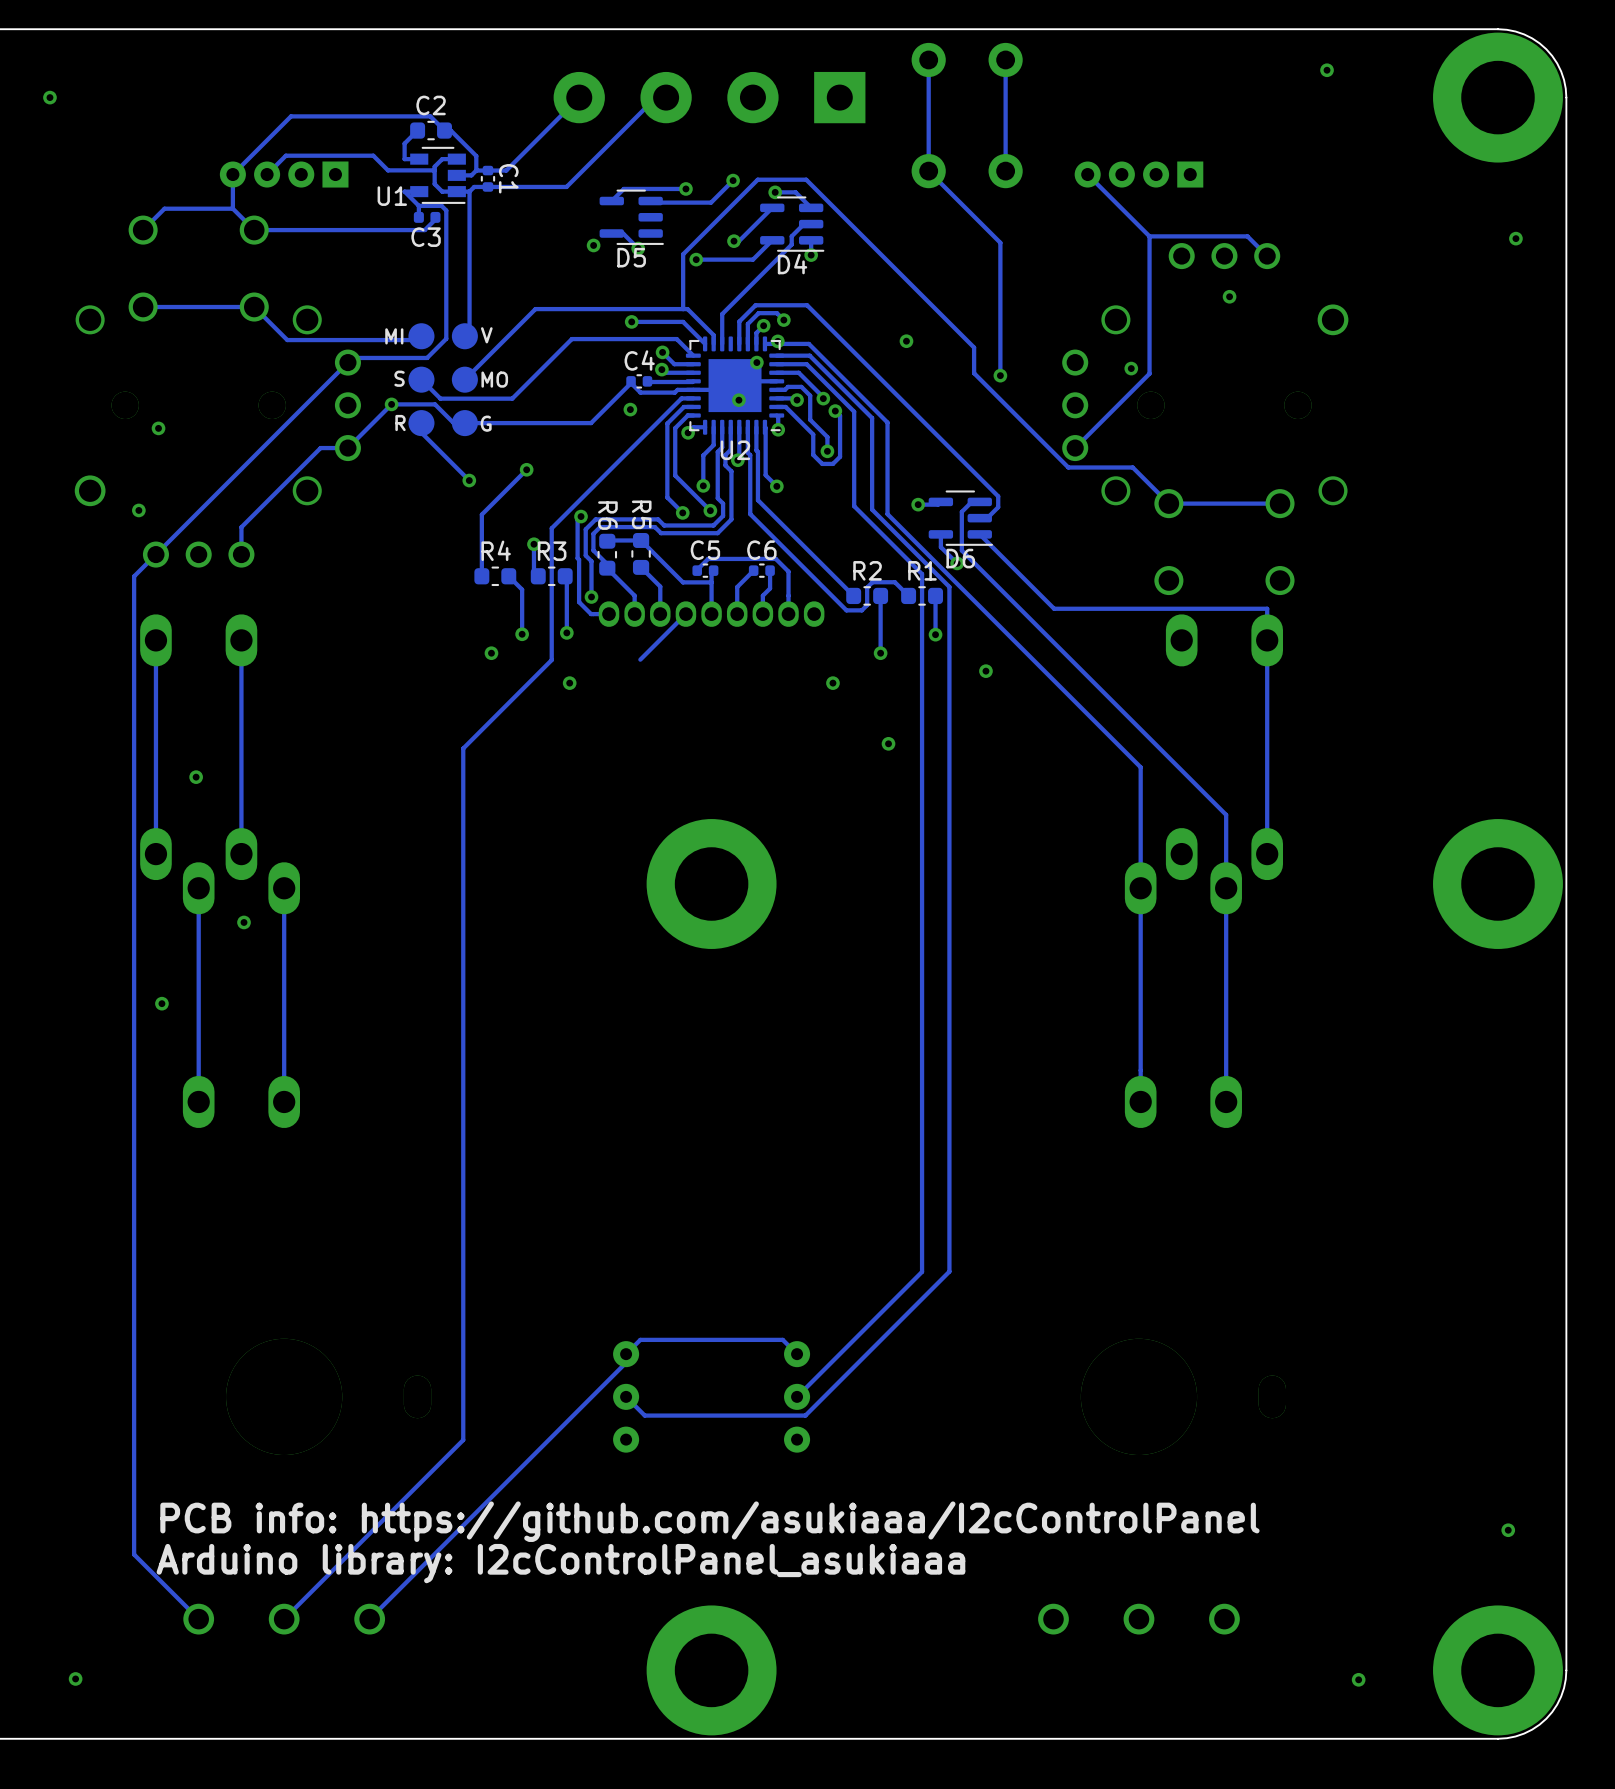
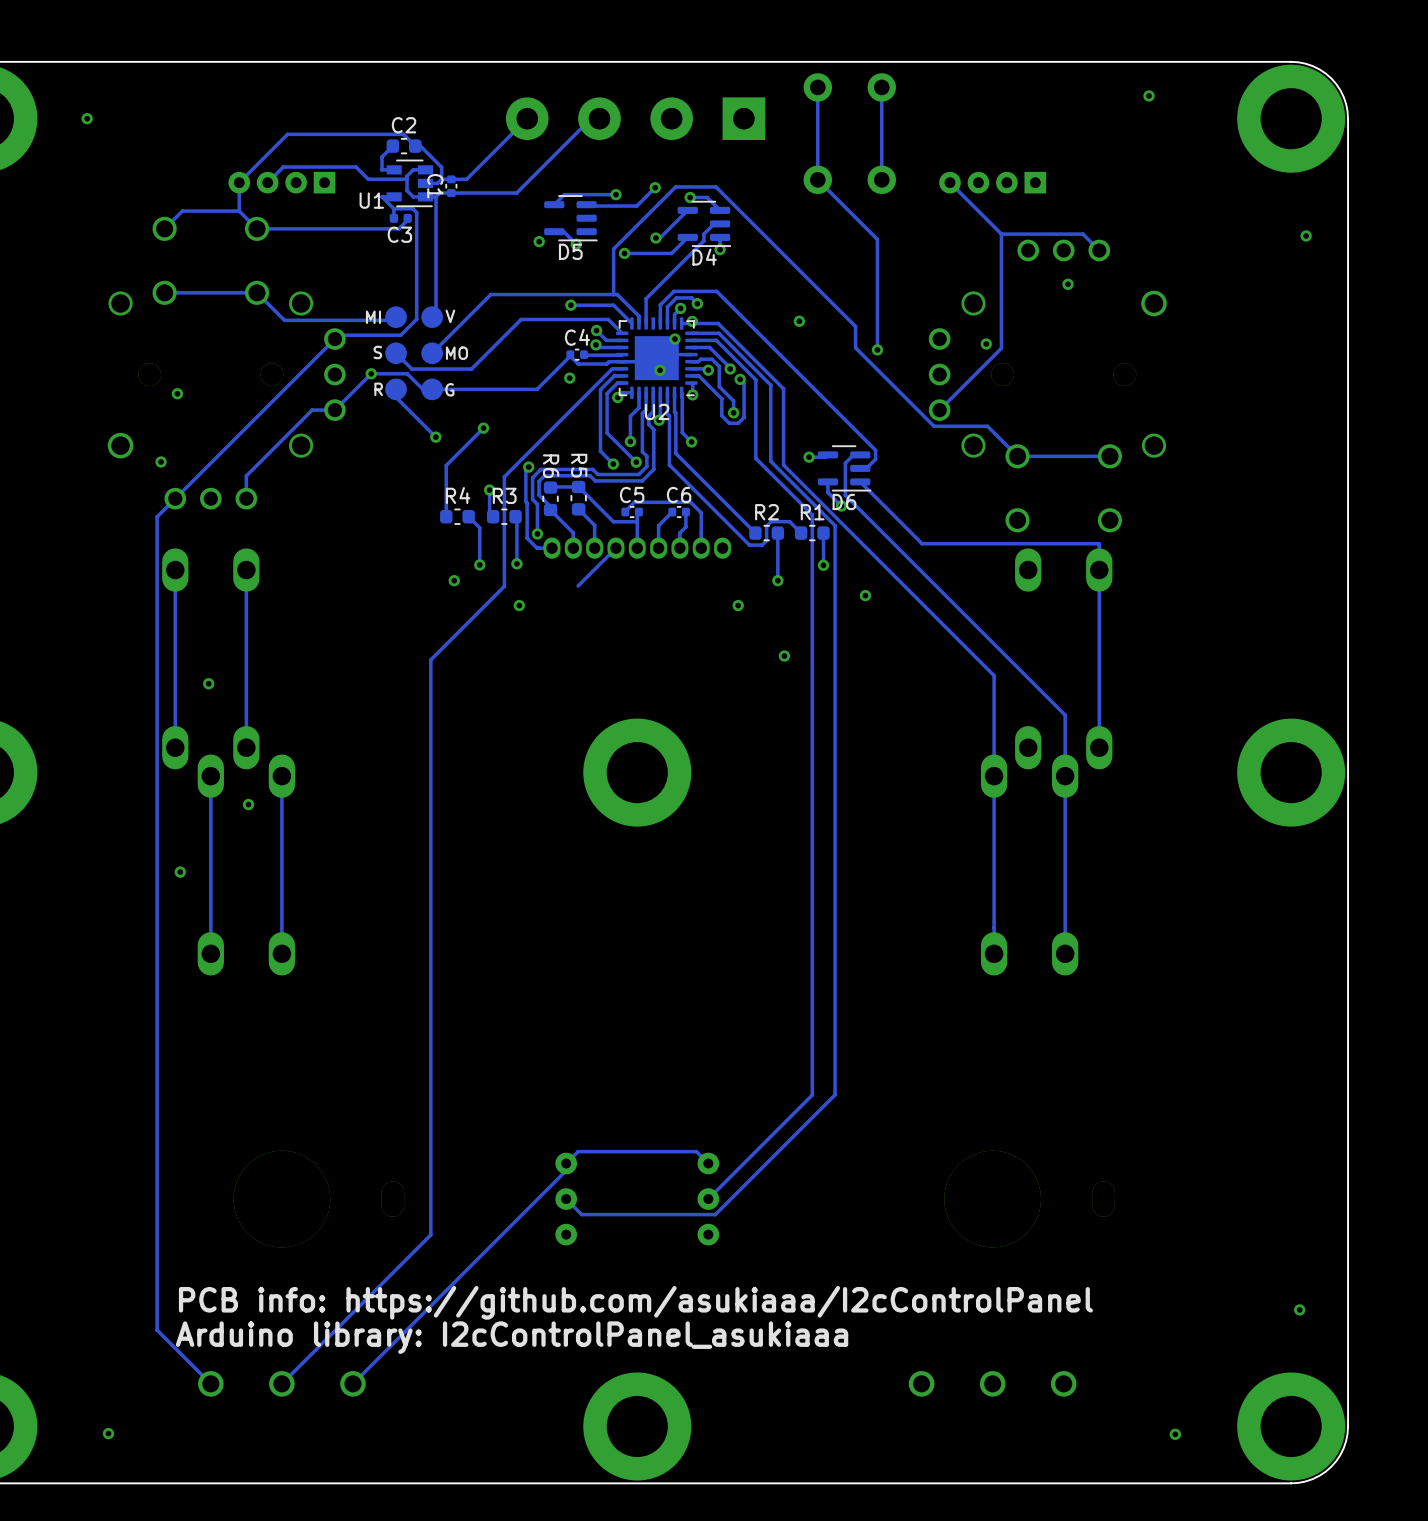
C1 name position: C1 (508, 178) -> C1 (435, 186)

